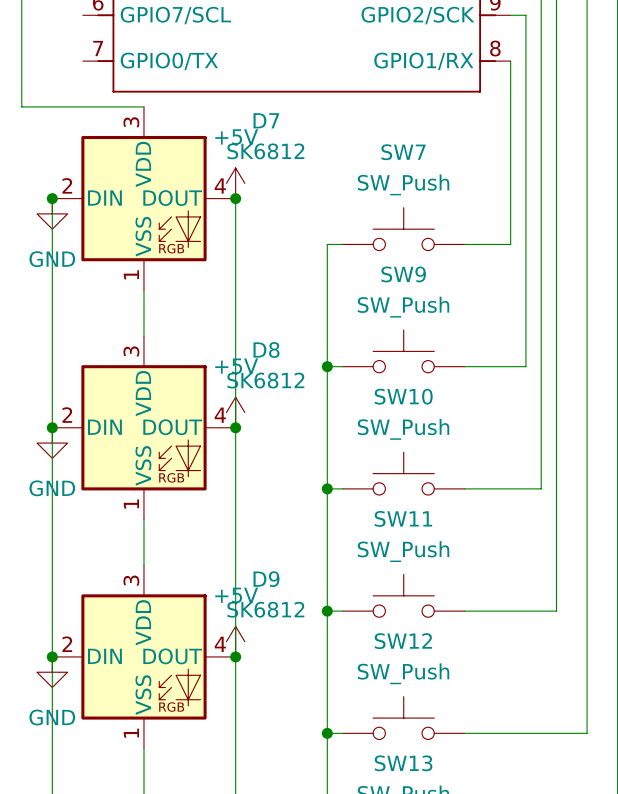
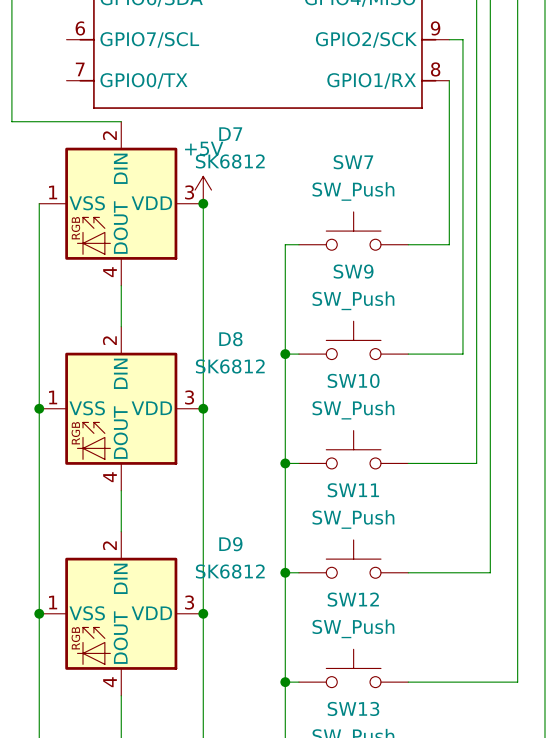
junction: (52, 198) -> none
D7 rotation: 0° (143, 198) -> 90° clockwise (121, 203)
power symbol: GND (52, 213) -> none
power symbol: +5V (235, 412) -> none
D8 rotation: 0° (143, 427) -> 90° clockwise (121, 408)
power symbol: GND (52, 443) -> none
power symbol: +5V (235, 641) -> none
D9 rotation: 0° (143, 656) -> 90° clockwise (121, 613)
power symbol: GND (52, 672) -> none

